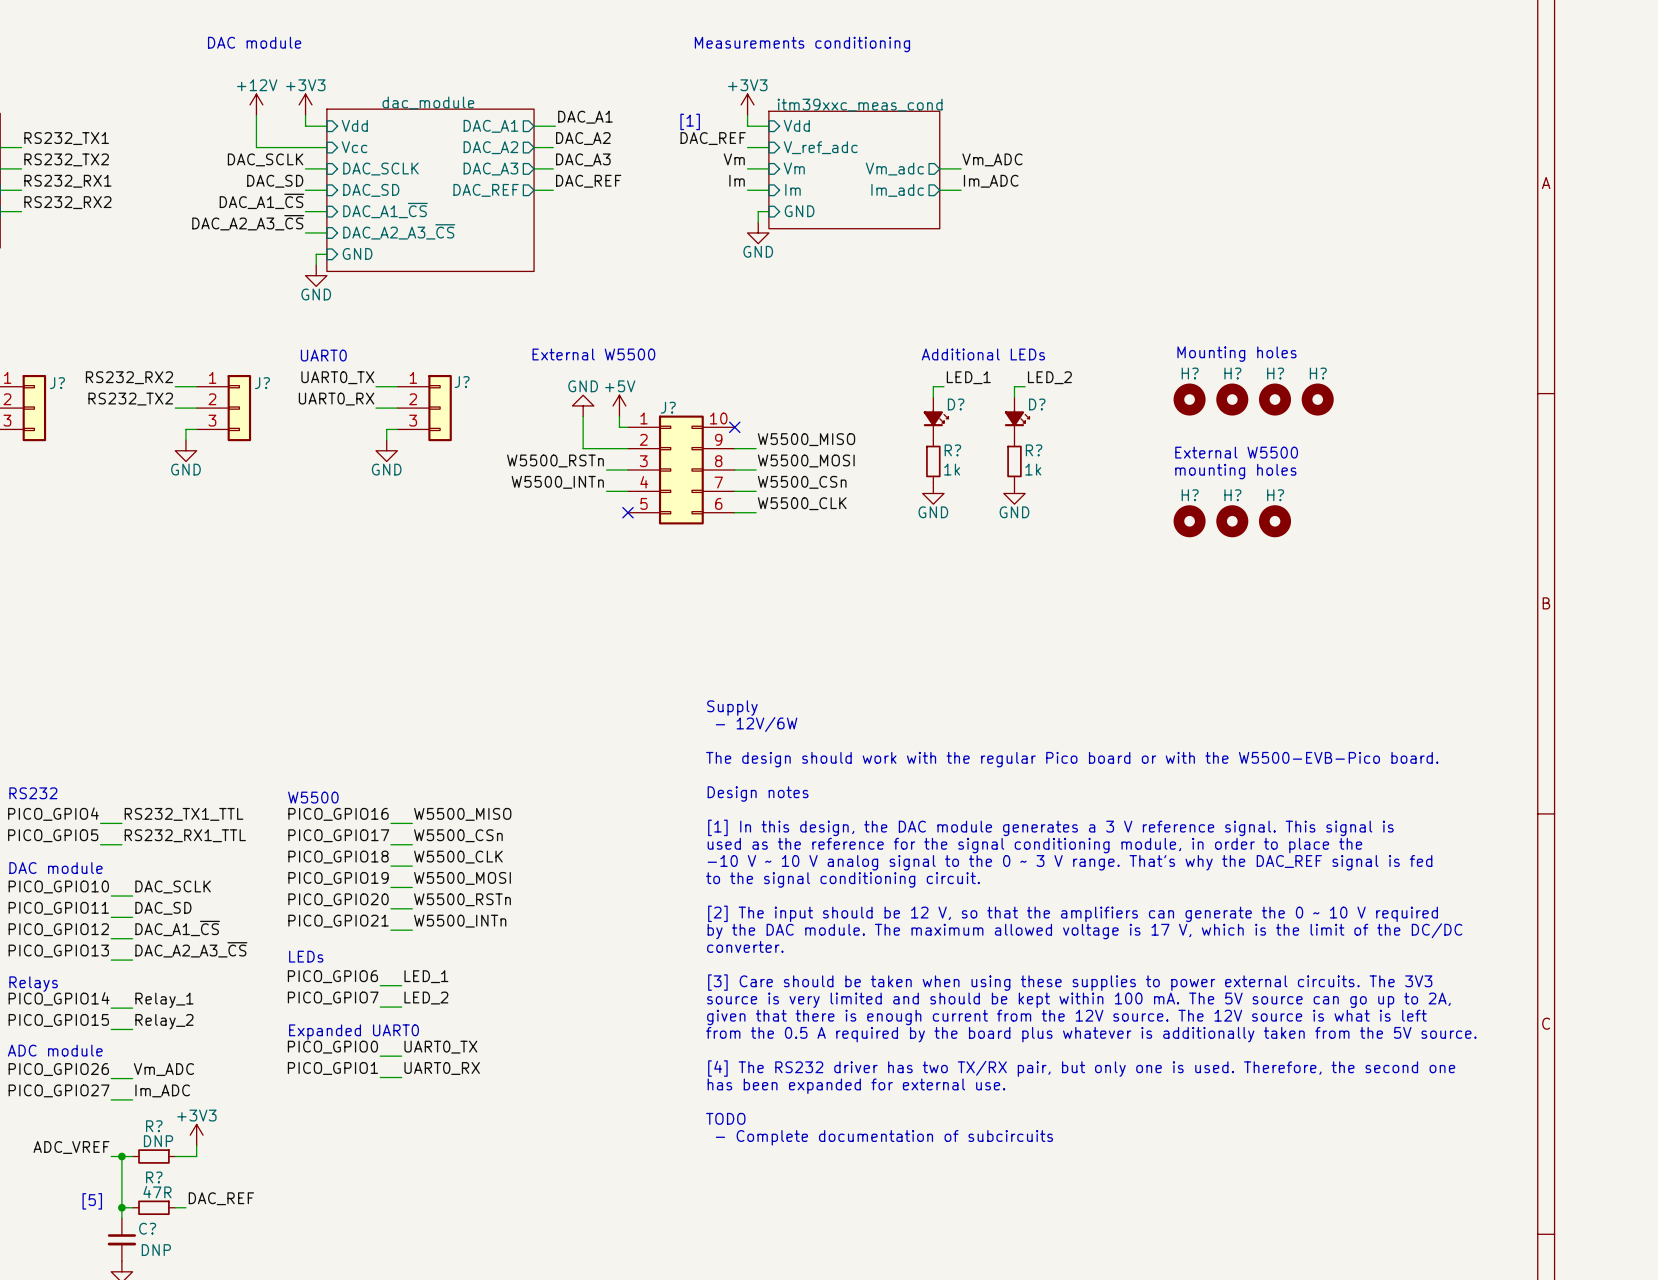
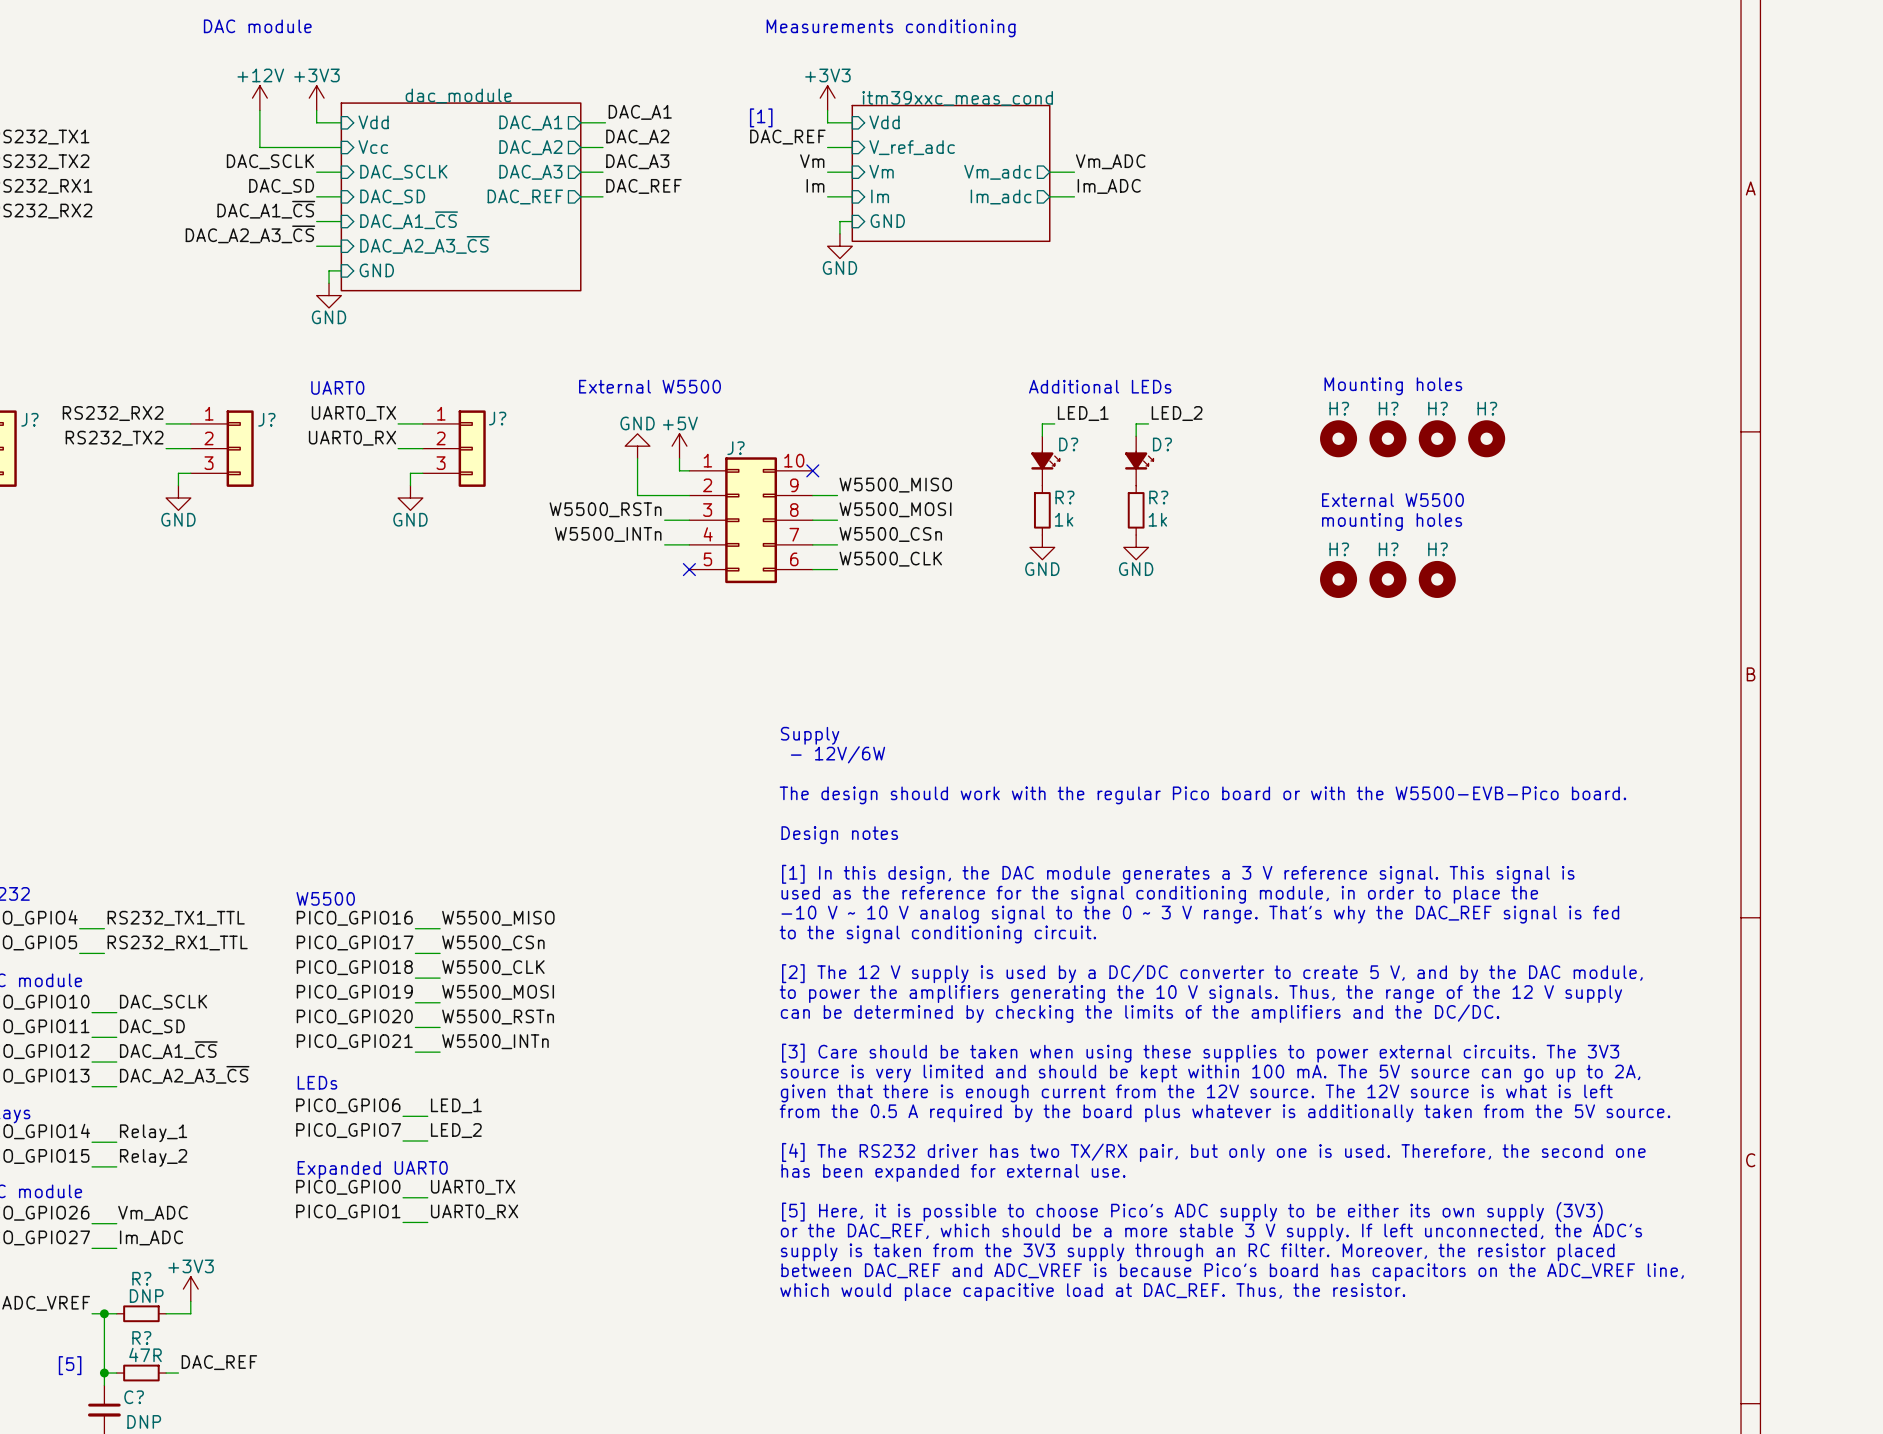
text: none -> Supply (810, 735)
text: Supply (732, 708) -> The design should work with the regular Pico board or with the W5500-EVB-Pico board. (1202, 795)
text position: - 12V/6W (756, 724) -> - 12V/6W (837, 754)
text: none -> Design notes (839, 835)
text: The design should work with the regular Pico board or with the W5500-EVB-Pico board. (1072, 759) -> none
text: none -> [1] In this design, the DAC module generates a 3 V reference signal. This signal is (1178, 874)
text: Design notes (758, 794) -> used as the reference for the signal conditioning module, in order to place the (1159, 894)
text: none -> -10 V ~ 10 V analog signal to the 0 ~ 3 V range. That's why the DAC_REF signal is fed (1200, 914)
text: [1] In this design, the DAC module generates a 3 V reference signal. This signal is (1050, 827) -> to the signal conditioning circuit. (937, 934)
text: used as the reference for the signal conditioning module, in order to place the (1034, 845) -> none
text: -10 V ~ 10 V analog signal to the 0 ~ 3 V range. That's why the DAC_REF signal is fed (1069, 862) -> [2] The 12 V supply is used by a DC/DC converter to create 5 V, and by the DAC module, (1212, 973)
text: to the signal conditioning circuit. (842, 879) -> to power the amplifiers generating the 10 V signals. Thus, the range of the 12 V supply (1200, 994)
text: none -> can be determined by checking the limits of the amplifiers and the DC/DC. (1140, 1013)
text: [2] The input should be 12 V, so that the amplifiers can generate the 0 ~ 10 V required (1073, 913) -> none
text: by the DAC module. The maximum allowed voltage is 17 V, which is the limit of the DC/DC (1084, 931) -> [3] Care should be taken when using these supplies to power external circuits. The 3V3 (1200, 1053)
text: converter. (745, 946) -> source is very limited and should be kept within 100 mA. The 5V source can go up to 2A, (1210, 1073)
text: none -> given that there is enough current from the 12V source. The 12V source is what is left (1196, 1093)
text: [3] Care should be taken when using these supplies to power external circuits. The 3V3 (1070, 982) -> from the 0.5 A required by the board plus whatever is additionally taken from the 5V source. (1224, 1113)
text: source is very limited and should be kept within 100 mA. The 5V source can go up to 2A, (1078, 1000) -> none
text: given that there is enough current from the 12V source. The 12V source is what is left (1066, 1017) -> [4] The RS232 driver has two TX/RX pair, but only one is used. Therefore, the second one (1213, 1152)
text: from the 0.5 A required by the board plus whatever is additionally taken from the 5V source. (1091, 1034) -> has been expanded for external use. (953, 1172)
text: [4] The RS232 driver has two TX/RX pair, but only one is used. Therefore, the second one (1081, 1068) -> [5] Here, it is possible to choose Pico's ADC supply to be either its own supply (3V3) (1192, 1212)
text: has been expanded for external use. (856, 1086) -> or the DAC_REF, which should be a more stable 3 V supply. If left unconnected, the ADC's (1211, 1232)
text: none -> supply is taken from the 3V3 supply through an RC filter. Moreover, the resistor placed (1197, 1252)
text: TODO (725, 1118) -> between DAC_REF and ADC_VREF is because Pico's board has capacitors on the ADC_VREF line, (1232, 1272)
text: - Complete documentation of subcircuits (884, 1137) -> which would place capacitive load at DAC_REF. Thus, the resistor. (1092, 1292)

